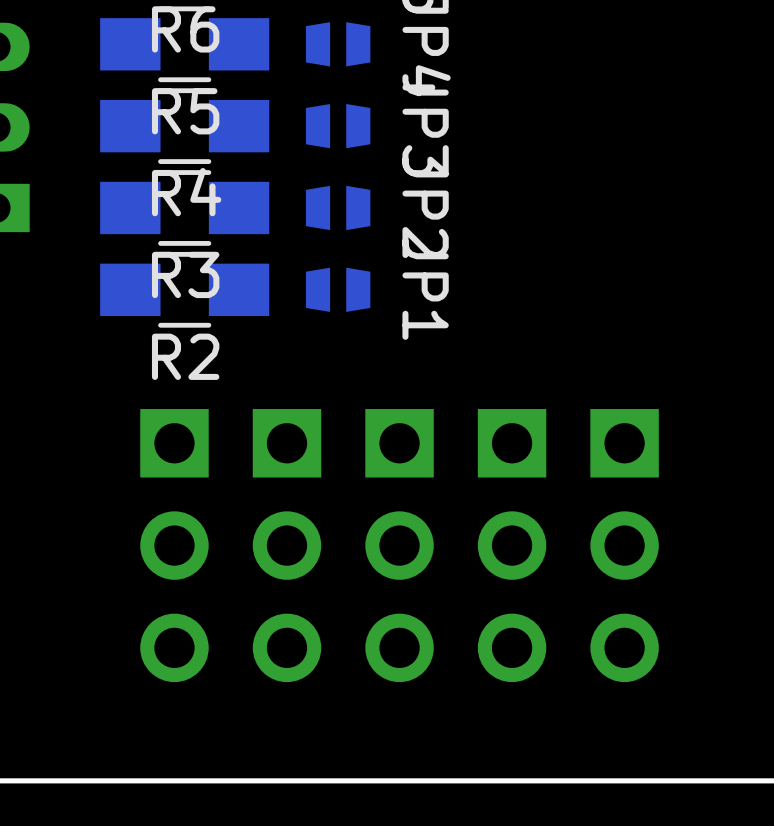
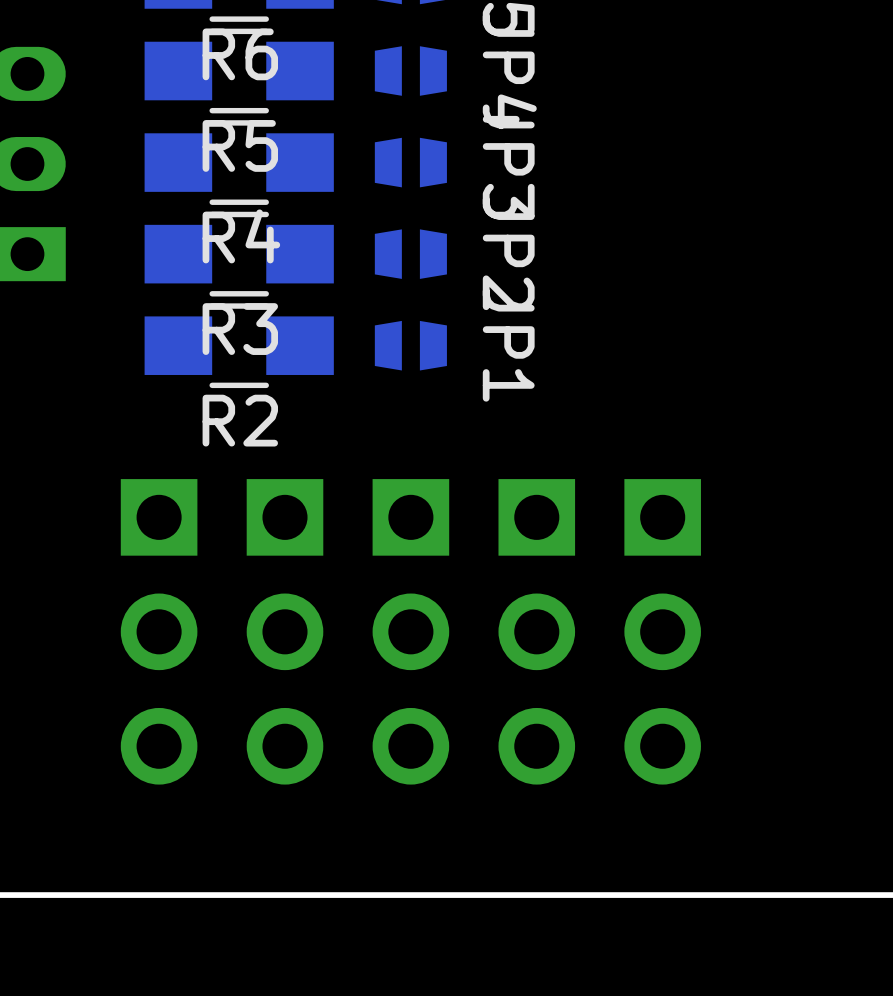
part: none -> (159, 631)
part: (174, 545) -> none
part: none -> (284, 631)
part: (287, 545) -> none
part: none -> (410, 631)
part: (399, 545) -> none
part: none -> (536, 631)
part: (512, 545) -> none
part: none -> (662, 631)
part: (624, 545) -> none

